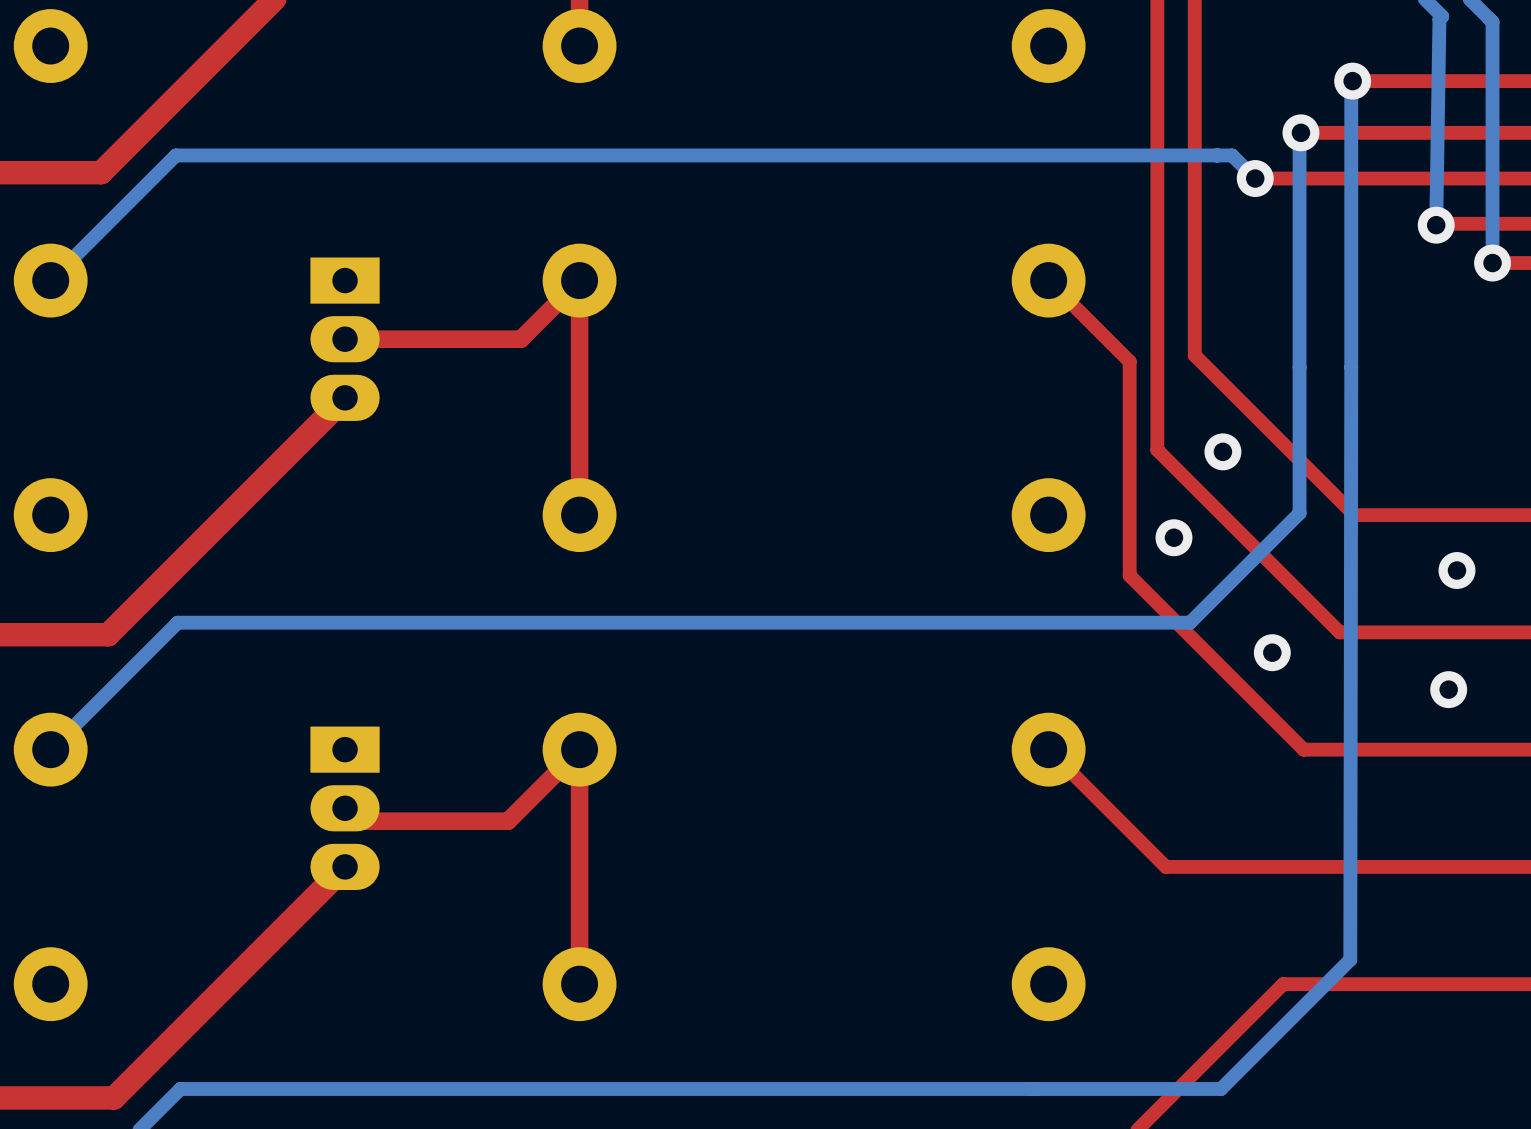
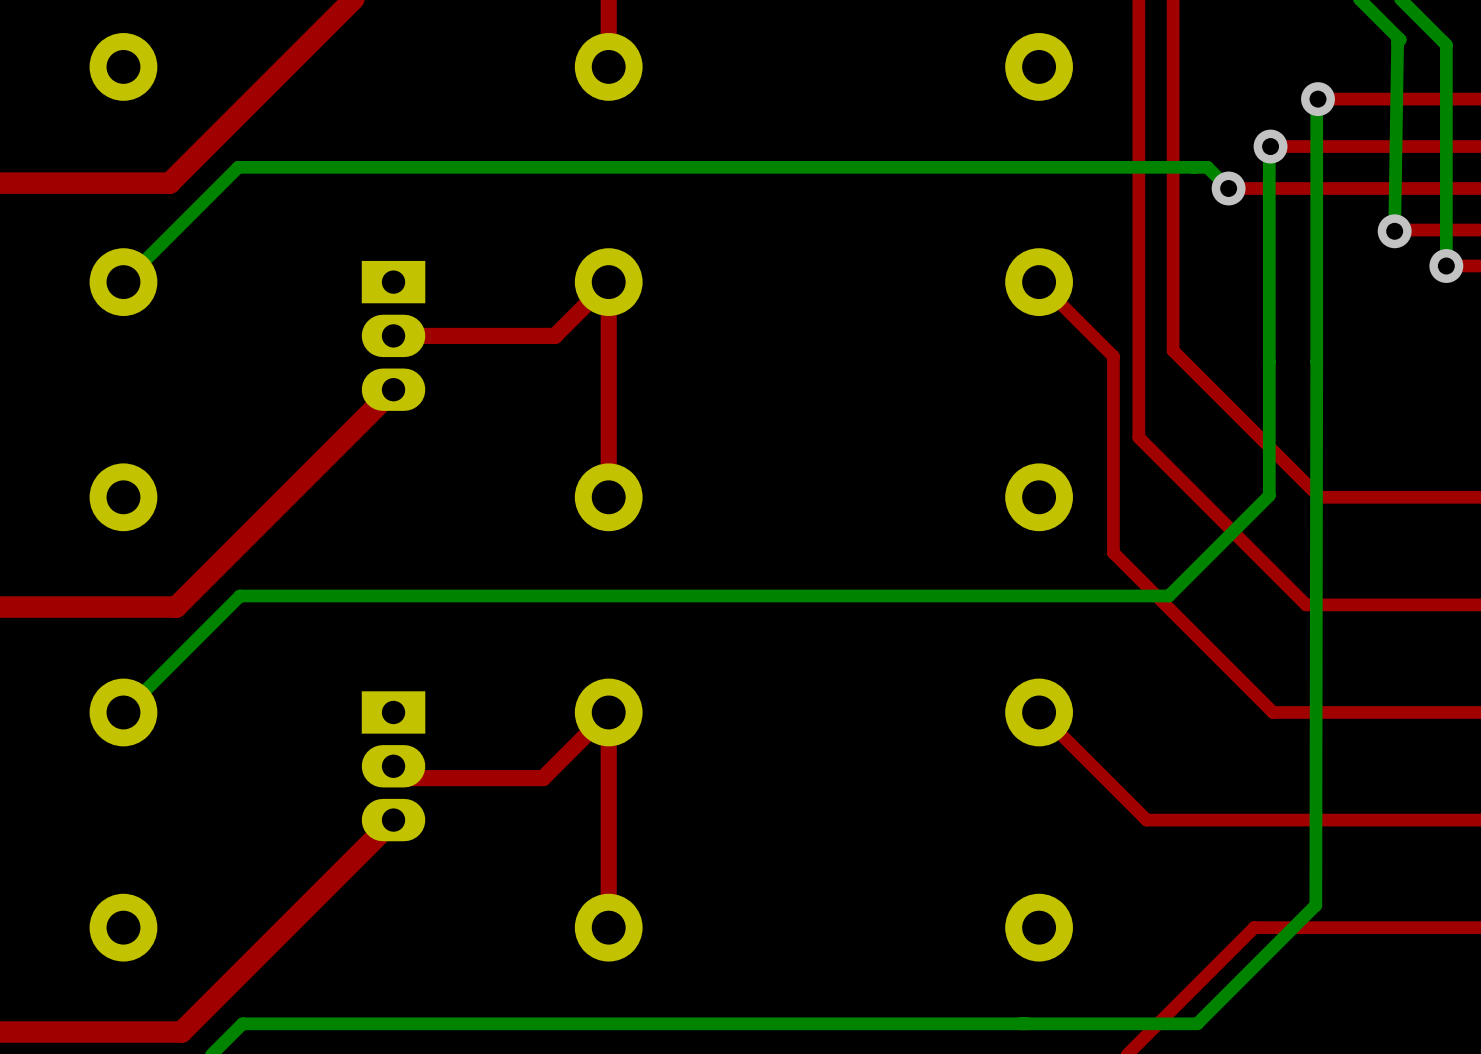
via: (1222, 451) -> none
via: (1173, 537) -> none
via: (1456, 570) -> none
via: (1272, 652) -> none
via: (1448, 689) -> none

